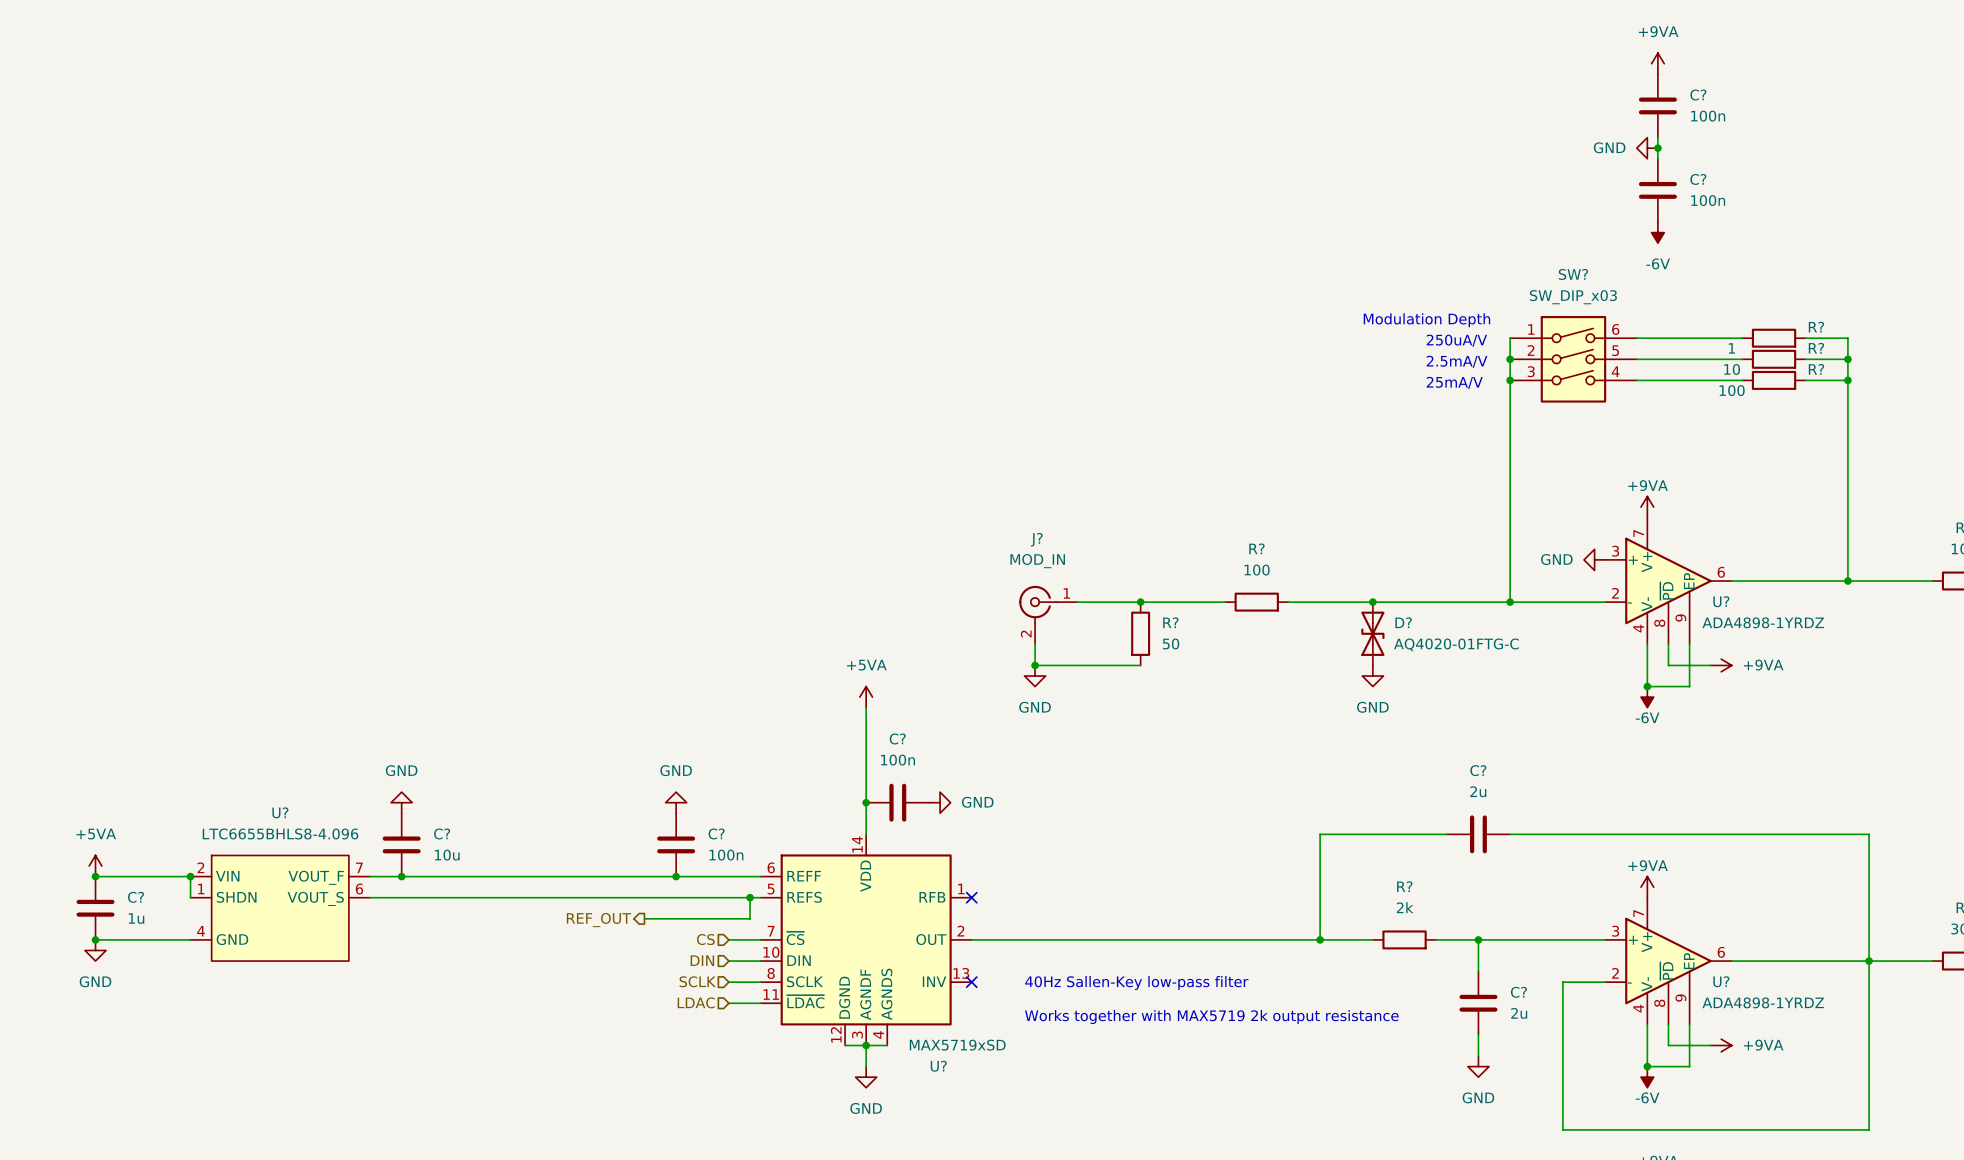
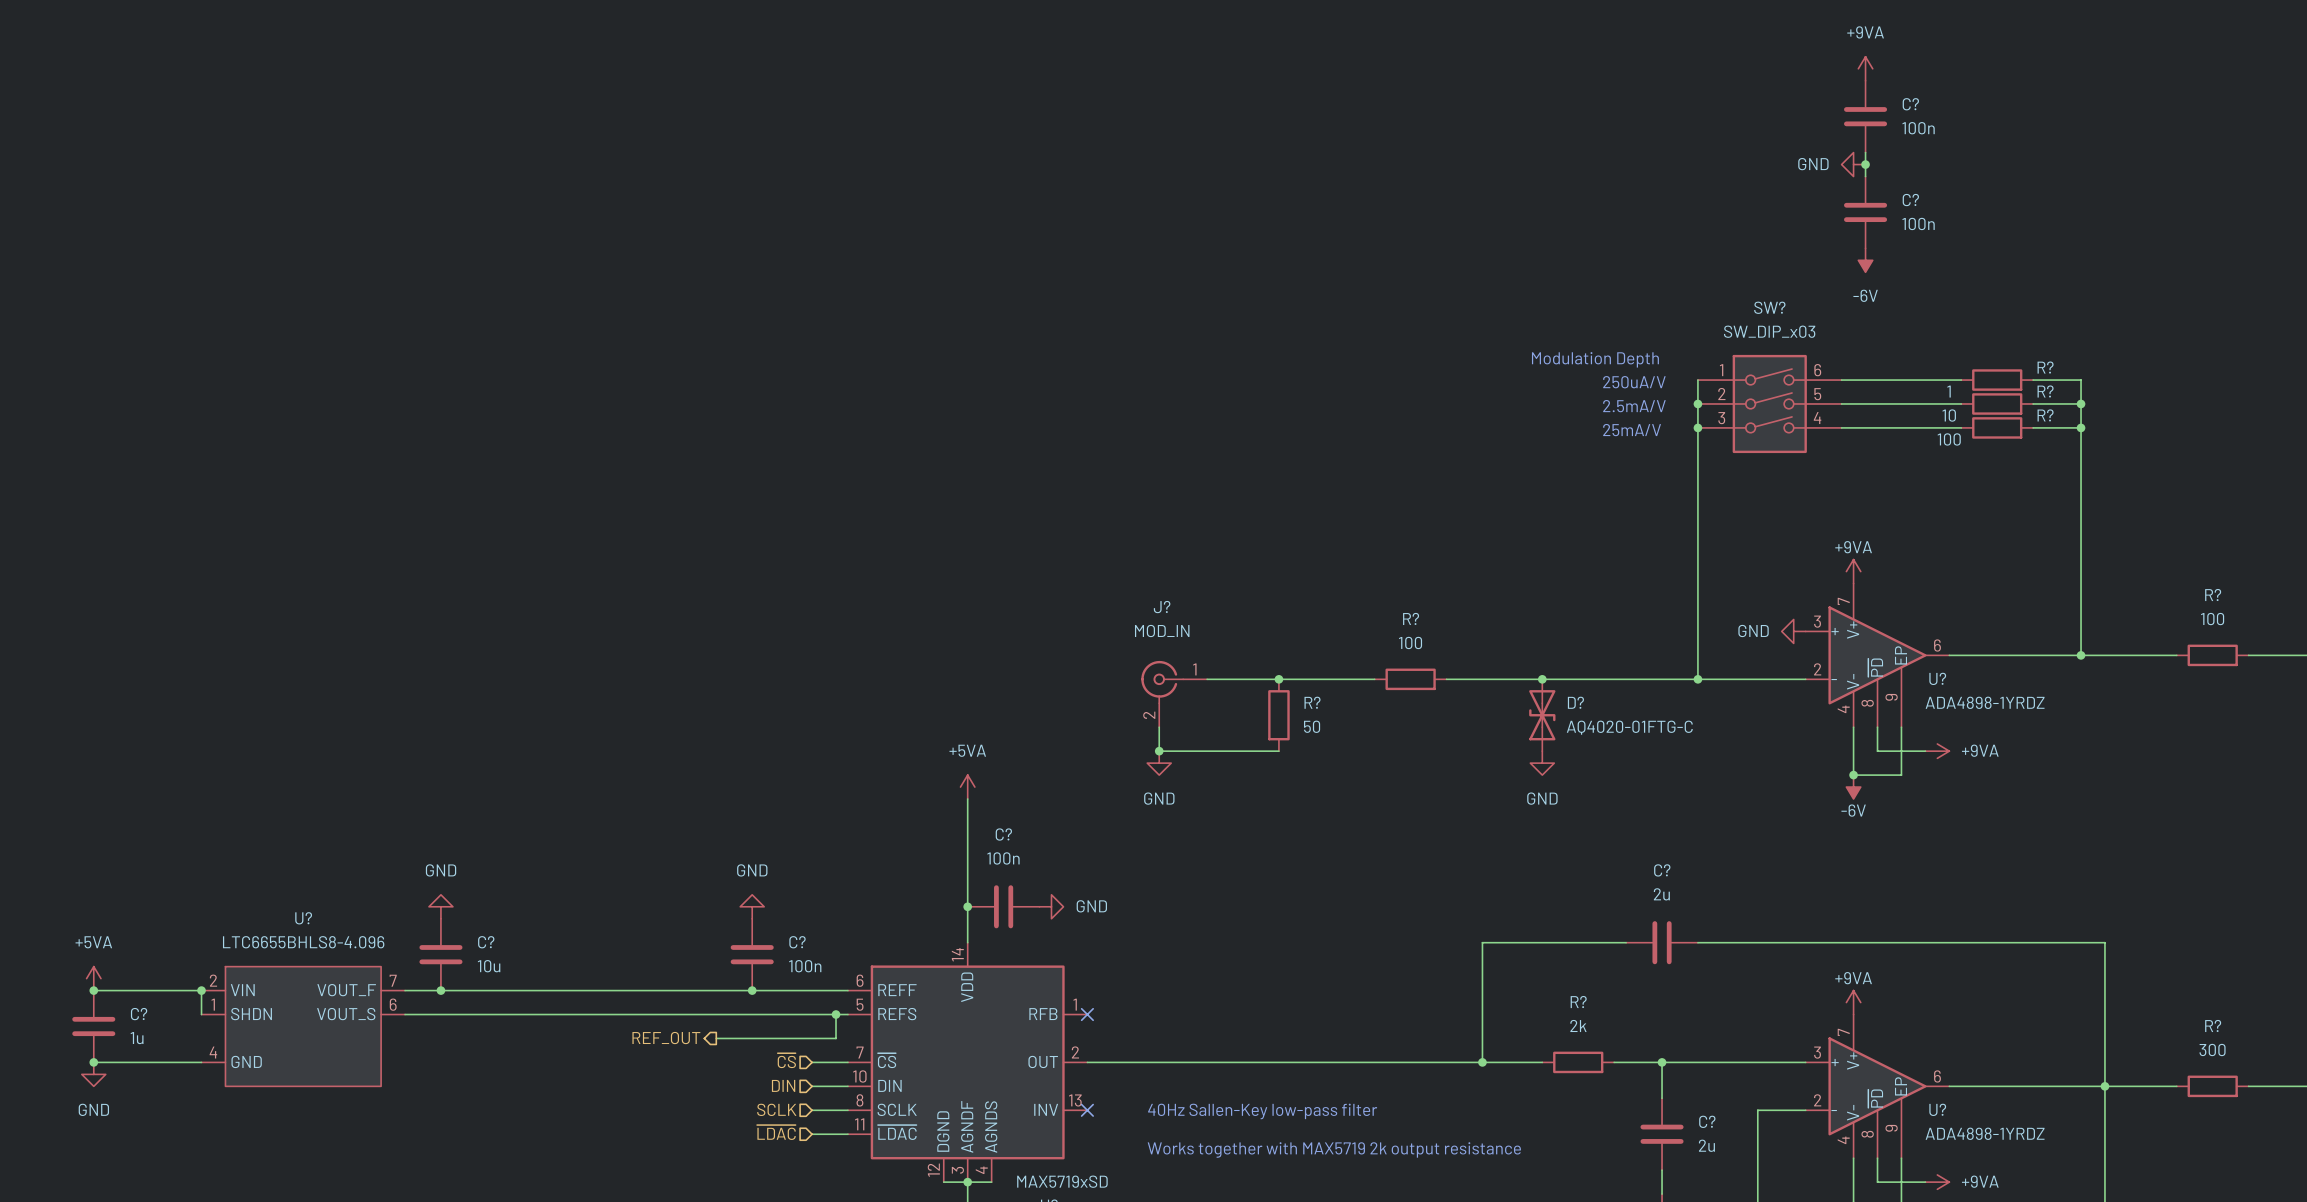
hierarchical label: CS (705, 939) -> ~{CS} (786, 1060)
hierarchical label: LDAC (696, 1002) -> ~{LDAC} (776, 1132)

